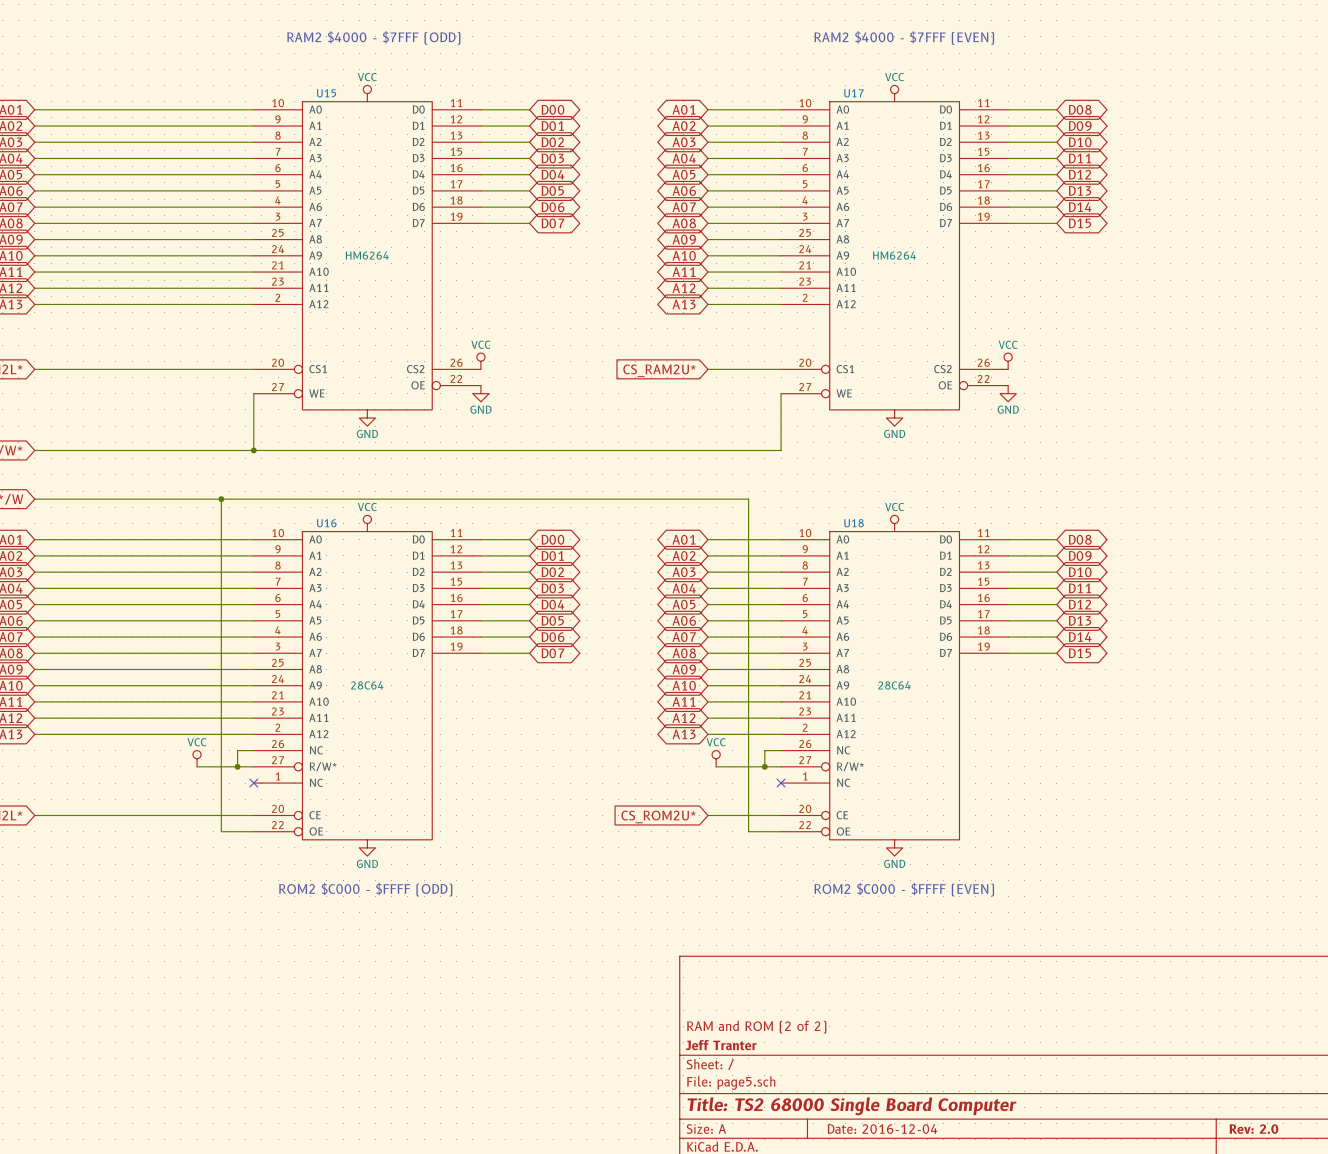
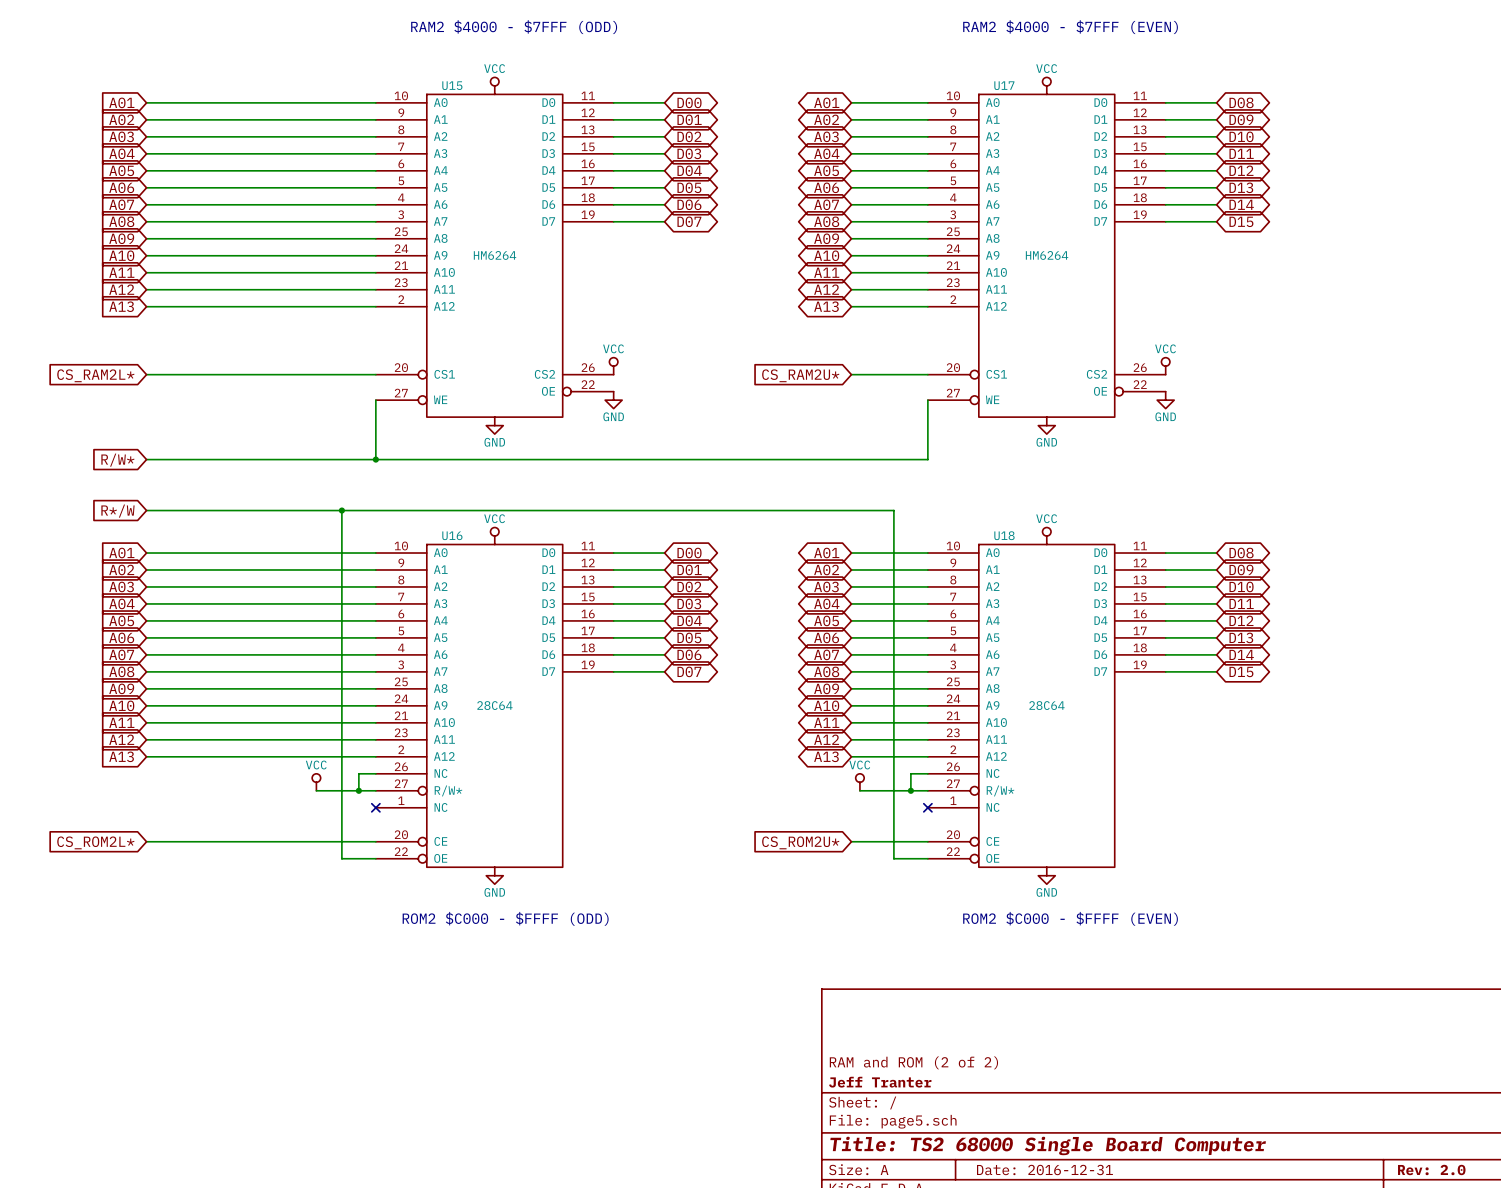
title block: Date: 2016-12-04 (882, 1129) -> Date: 2016-12-31 (1044, 1169)

